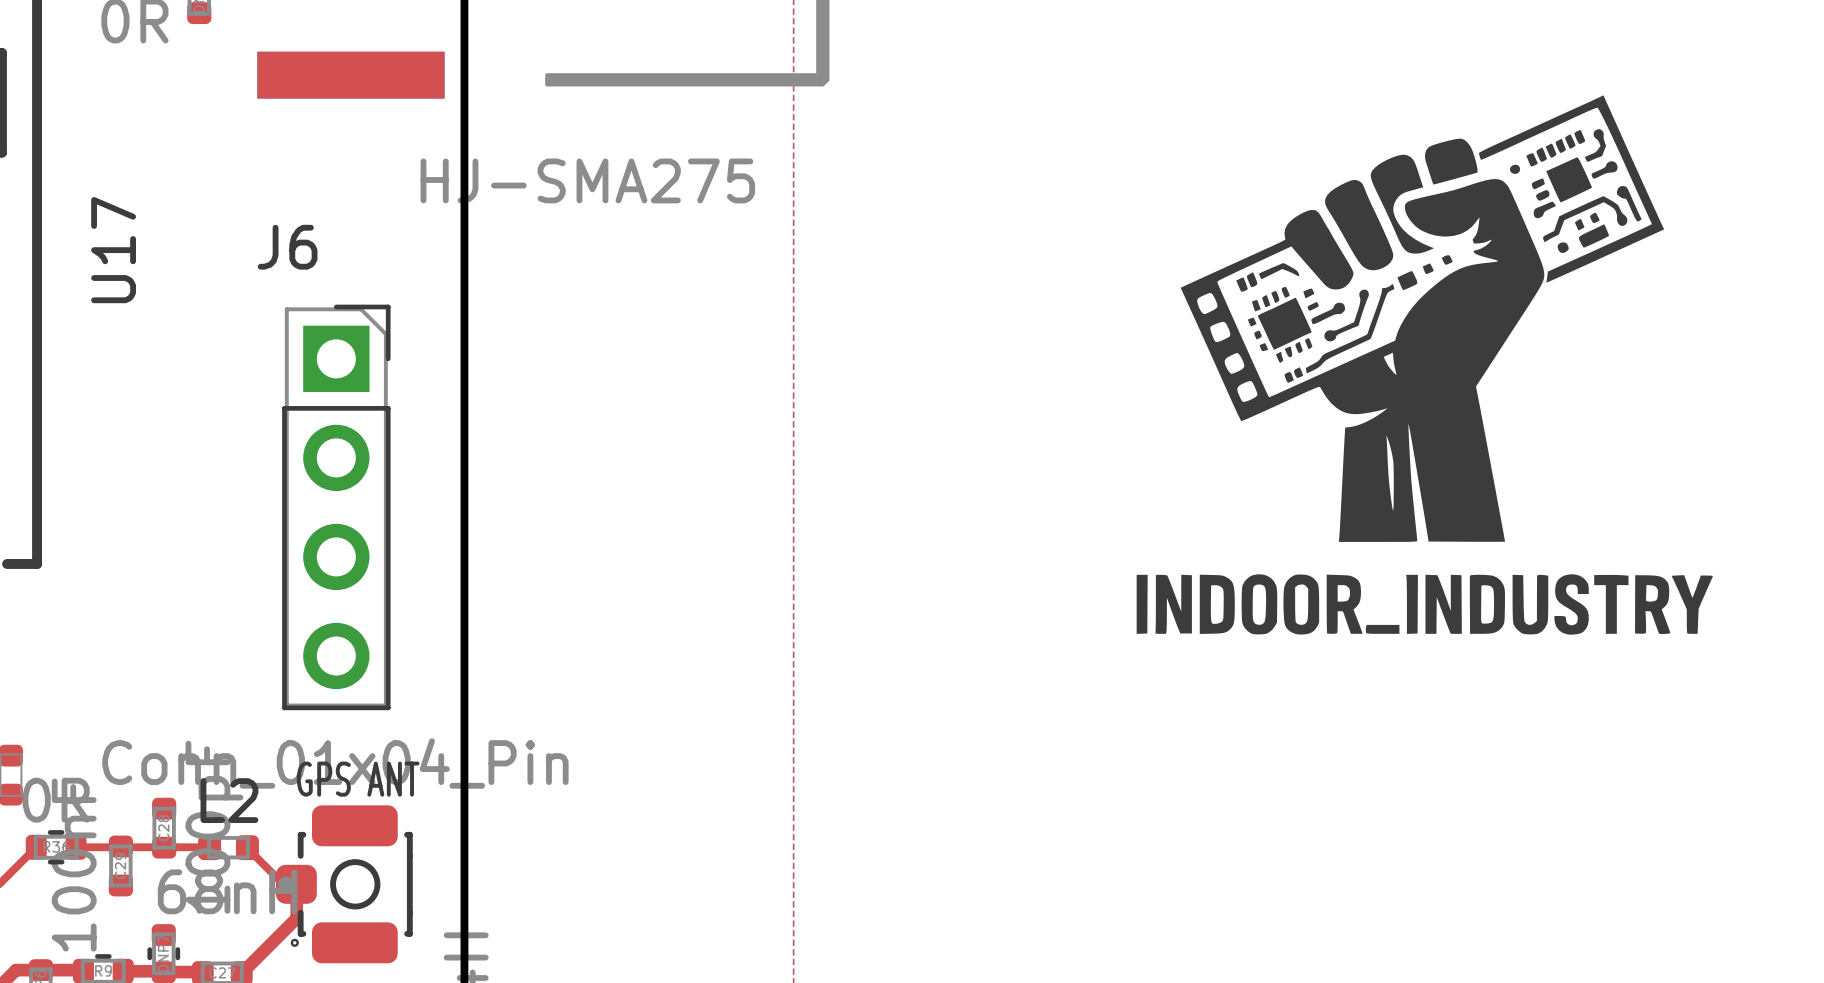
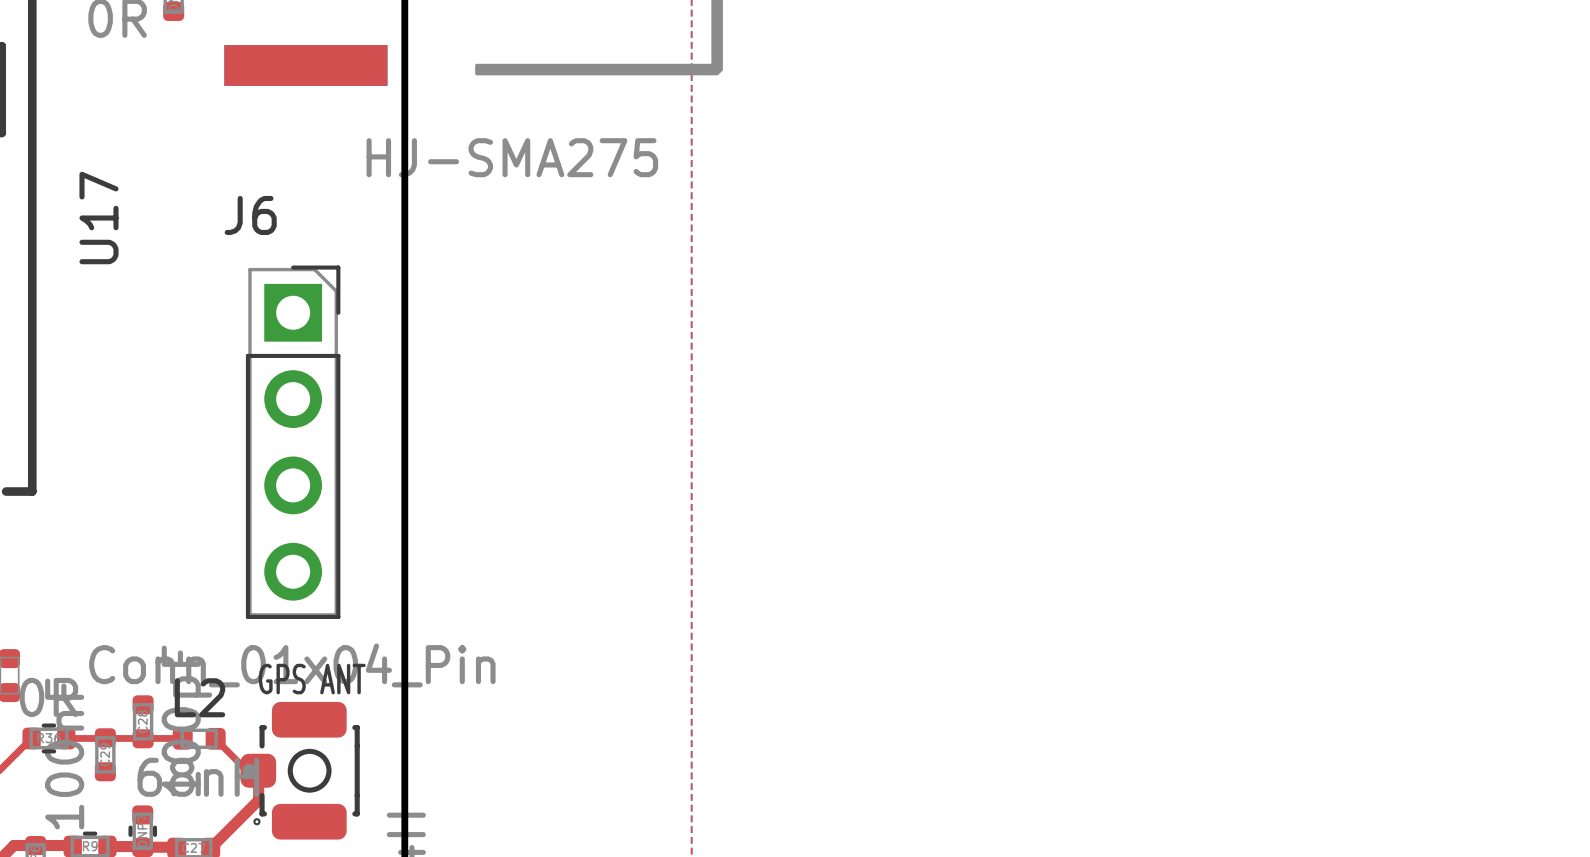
drawing: [1136, 95, 1713, 635] -> none

